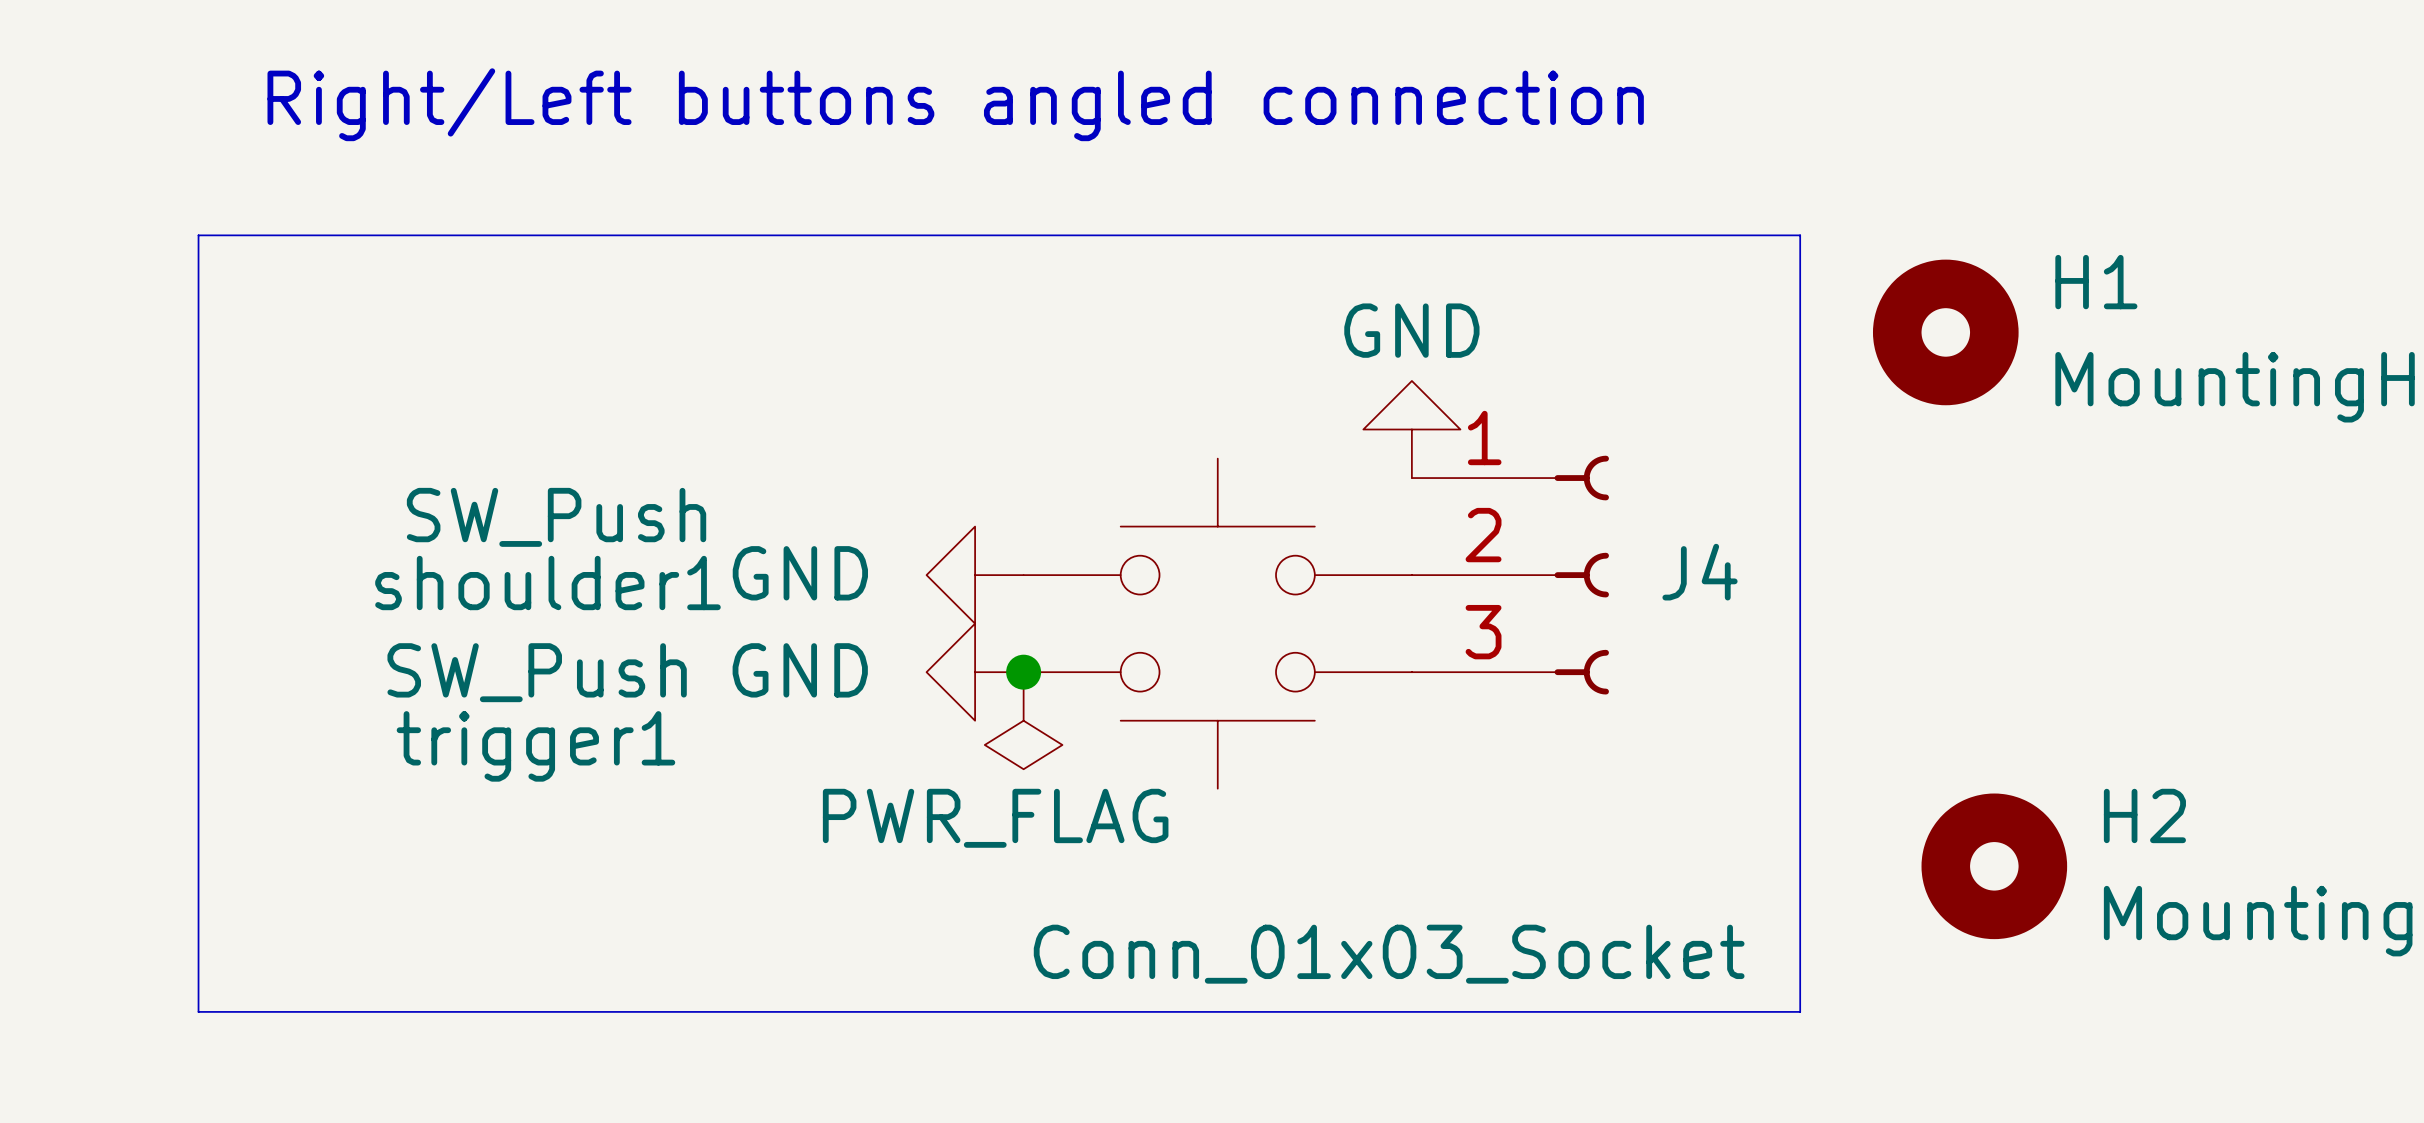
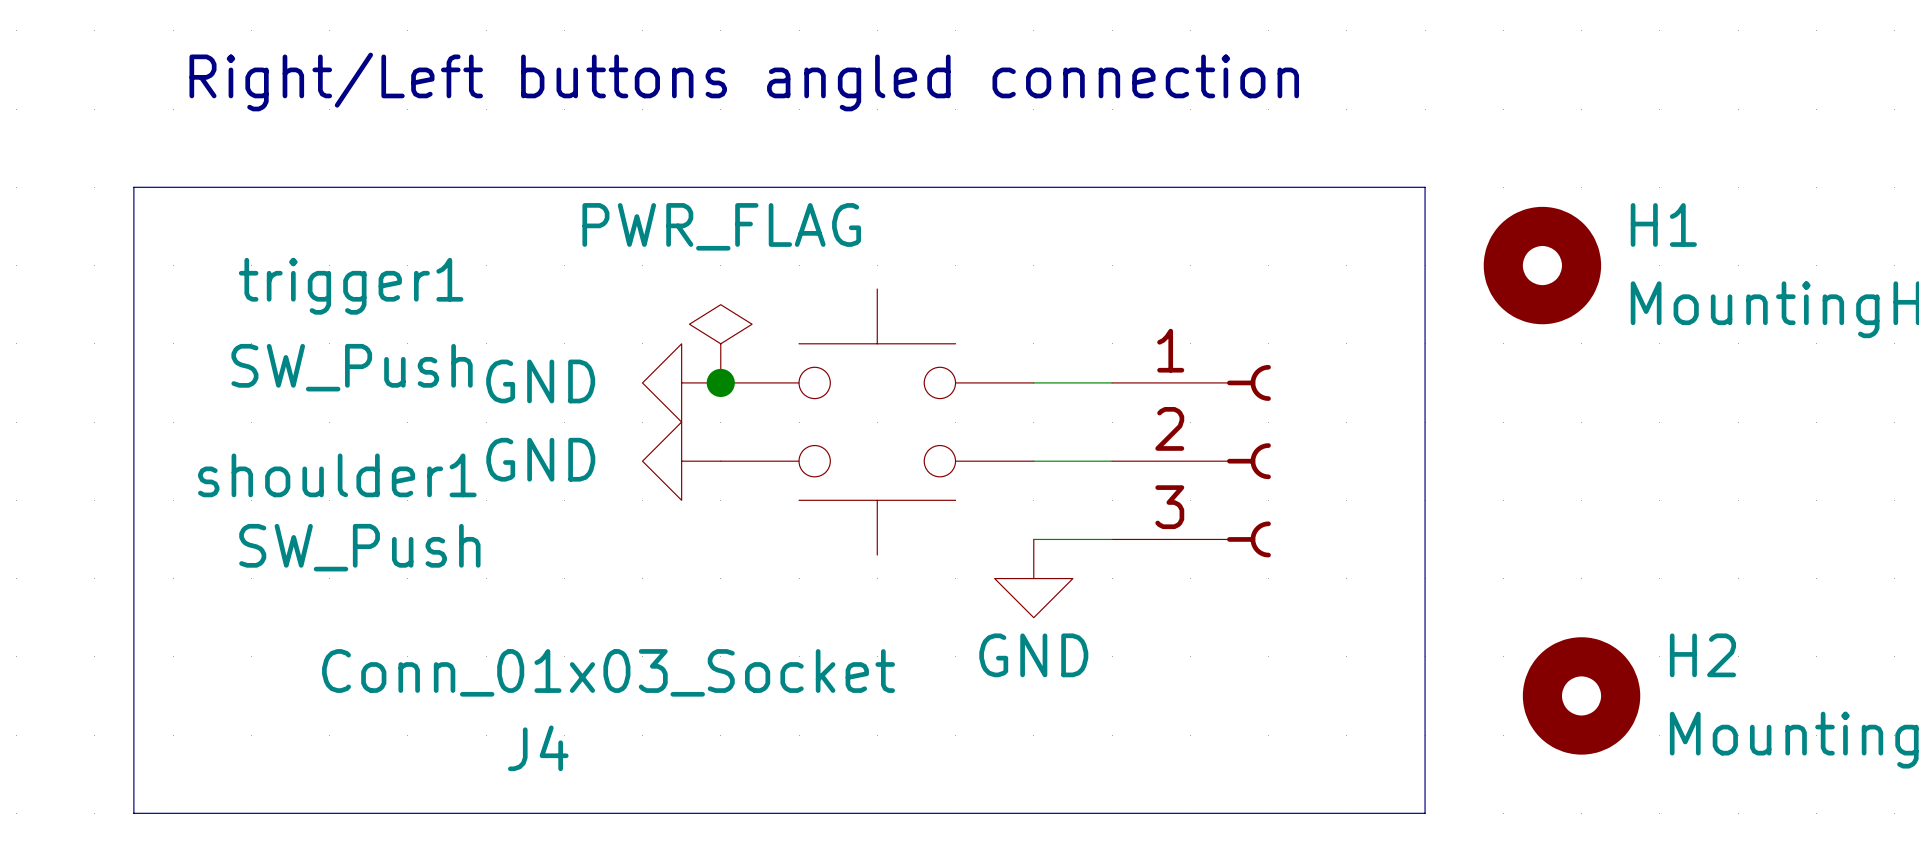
power symbol: GND (1411, 429) -> none
power symbol: none -> GND (681, 382)
wire: none -> (1033, 382) (1112, 382)
shoulder1 rotation: 0° (1217, 526) -> 180° (877, 500)
J4 name position: J4 (1700, 572) -> J4 (538, 748)
power symbol: none -> GND (681, 461)
power symbol: GND (975, 575) -> none
shoulder1 name position: shoulder1 (547, 583) -> shoulder1 (337, 475)
trigger1 value position: SW_Push (537, 672) -> SW_Push (352, 367)
power symbol: GND (975, 672) -> none
junction position: (1023, 672) -> (720, 382)
power symbol rotation: 0° (1023, 720) -> 180° (720, 343)
power symbol position: PWR_FLAG (1023, 720) -> PWR_FLAG (720, 343)
trigger1 rotation: 0° (1217, 720) -> 180° (877, 343)
trigger1 position: (1217, 720) -> (877, 343)
power symbol: none -> GND (1033, 578)
trigger1 name position: trigger1 (535, 746) -> trigger1 (351, 286)
J4 value position: Conn_01x03_Socket (1389, 954) -> Conn_01x03_Socket (608, 672)

